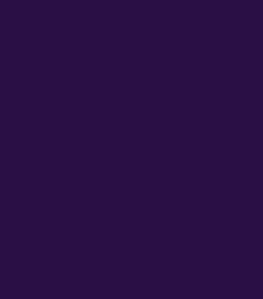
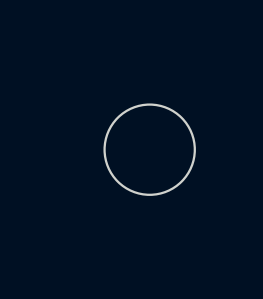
round board edge: none -> [103, 103, 196, 196]

